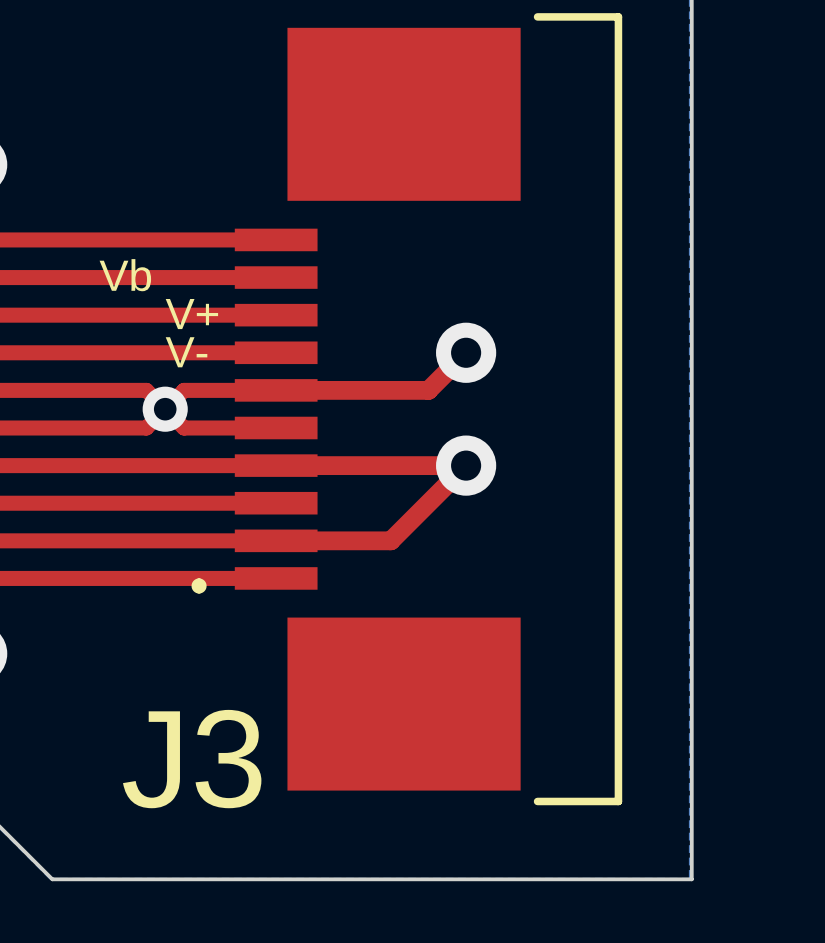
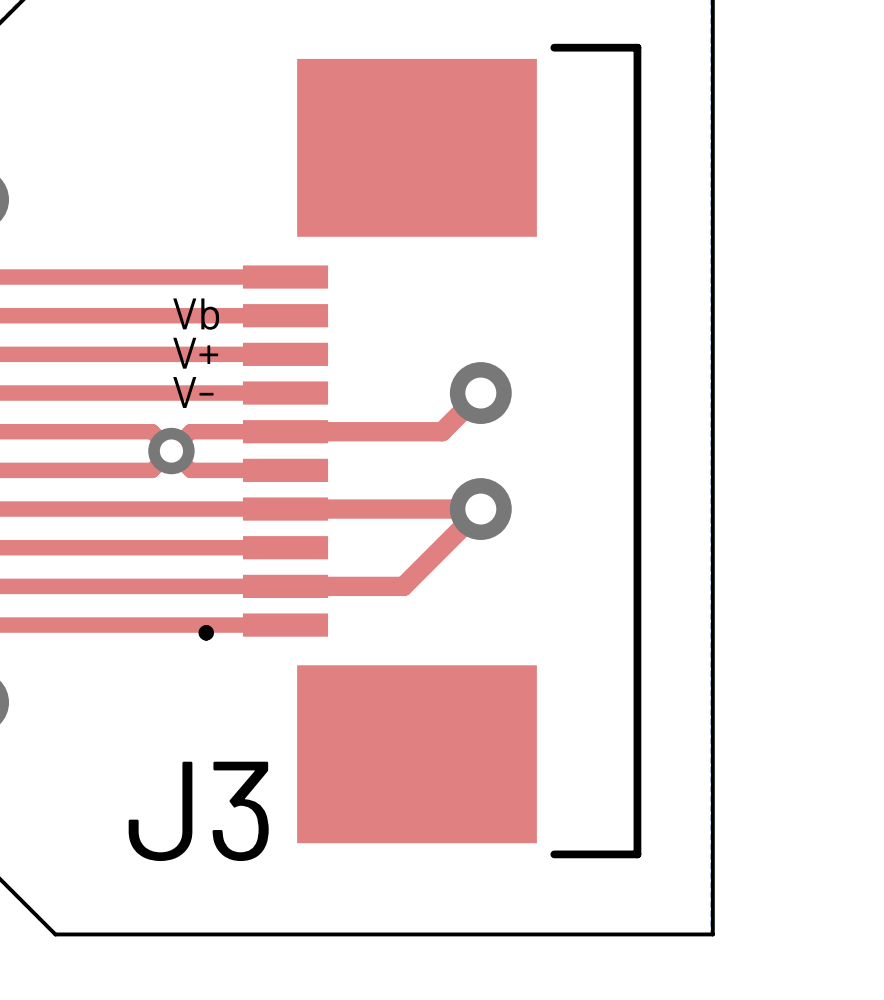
text position: Vb (125, 275) -> Vb (196, 314)

